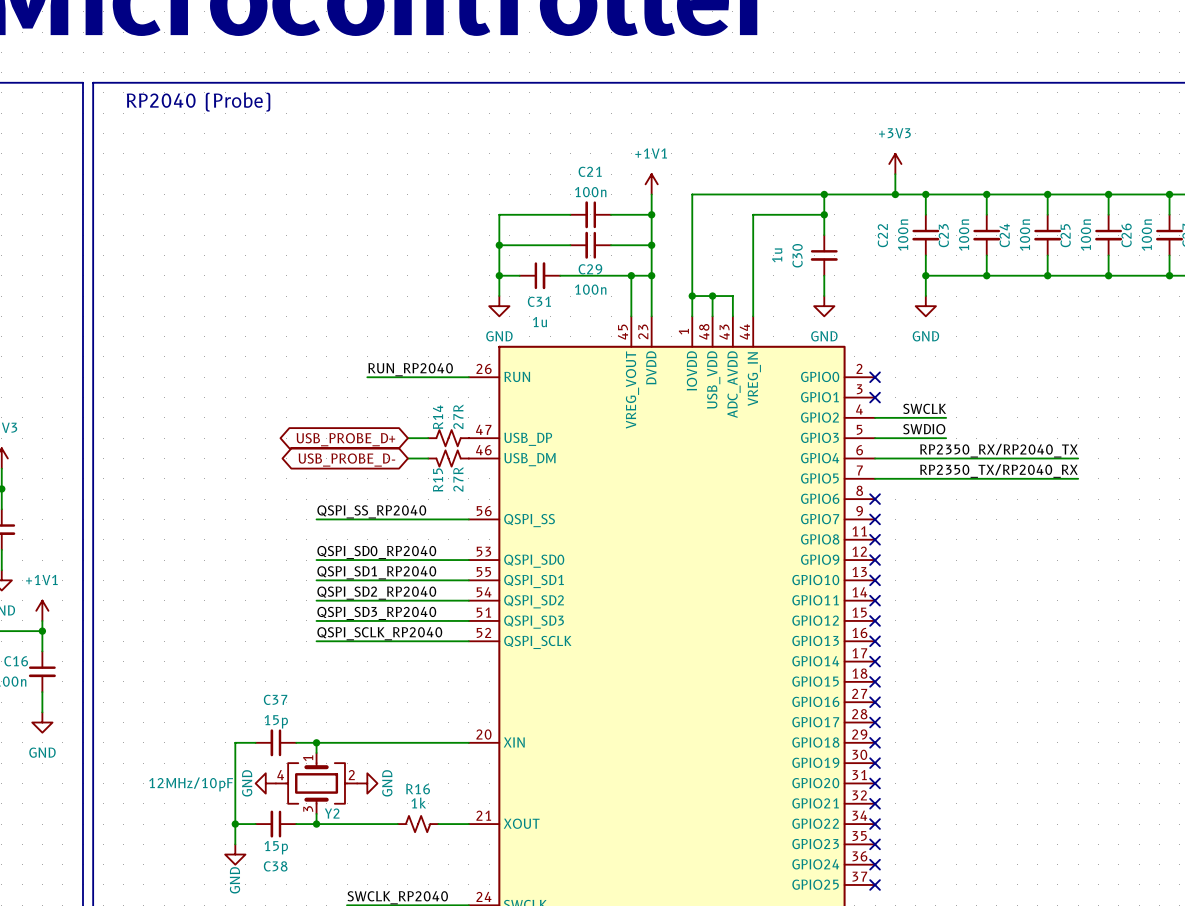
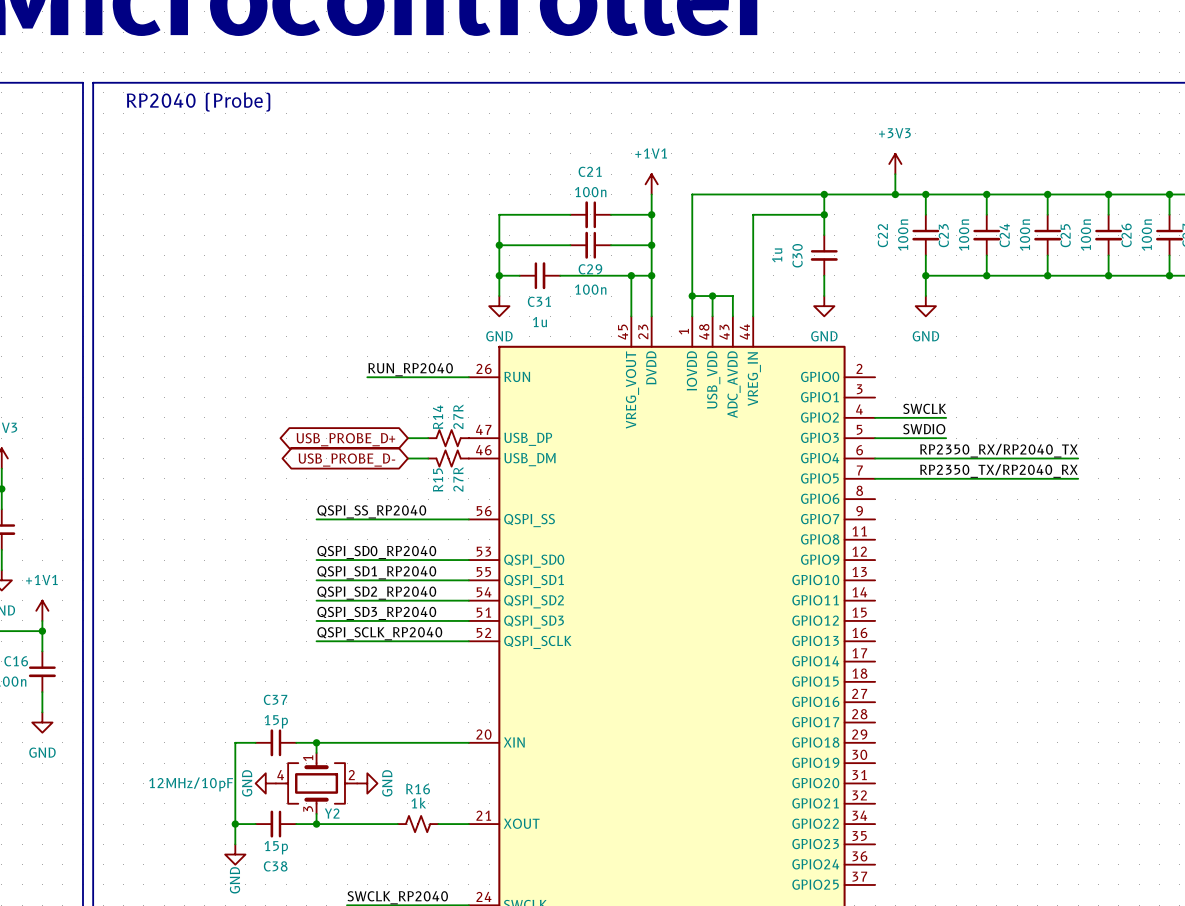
no-connect mark: (875, 377) -> none
no-connect mark: (875, 397) -> none
no-connect mark: (875, 499) -> none
no-connect mark: (875, 519) -> none
no-connect mark: (875, 539) -> none
no-connect mark: (875, 560) -> none
no-connect mark: (875, 580) -> none
no-connect mark: (875, 600) -> none
no-connect mark: (875, 620) -> none
no-connect mark: (875, 641) -> none
no-connect mark: (875, 661) -> none
no-connect mark: (875, 681) -> none
no-connect mark: (875, 702) -> none
no-connect mark: (875, 722) -> none
no-connect mark: (875, 742) -> none
no-connect mark: (875, 763) -> none
no-connect mark: (875, 783) -> none
no-connect mark: (875, 803) -> none
no-connect mark: (875, 824) -> none
no-connect mark: (875, 844) -> none
no-connect mark: (875, 864) -> none
no-connect mark: (875, 884) -> none

